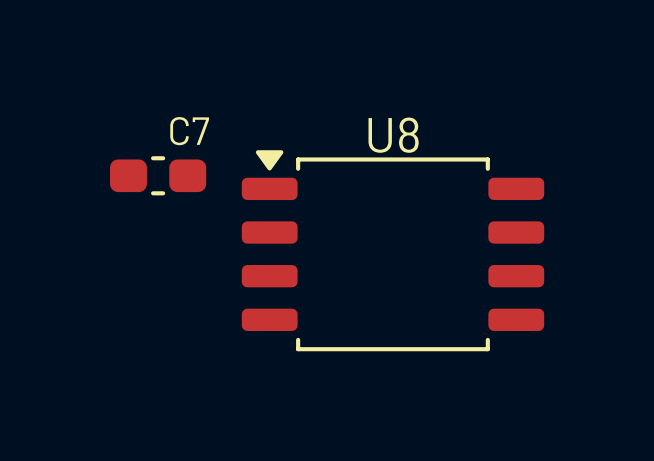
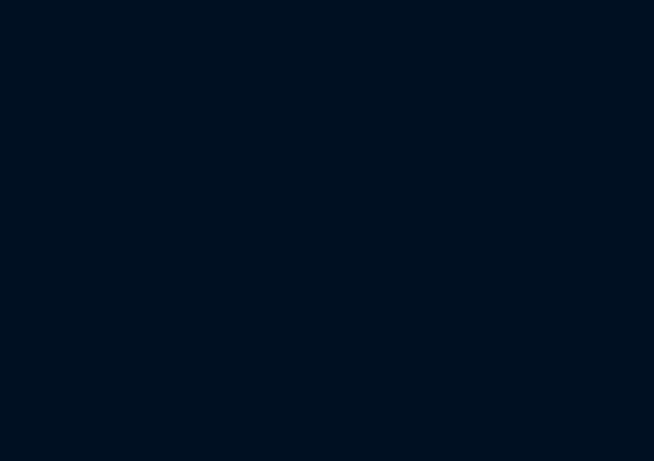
C7: (158, 175) -> none
U8: (392, 250) -> none

